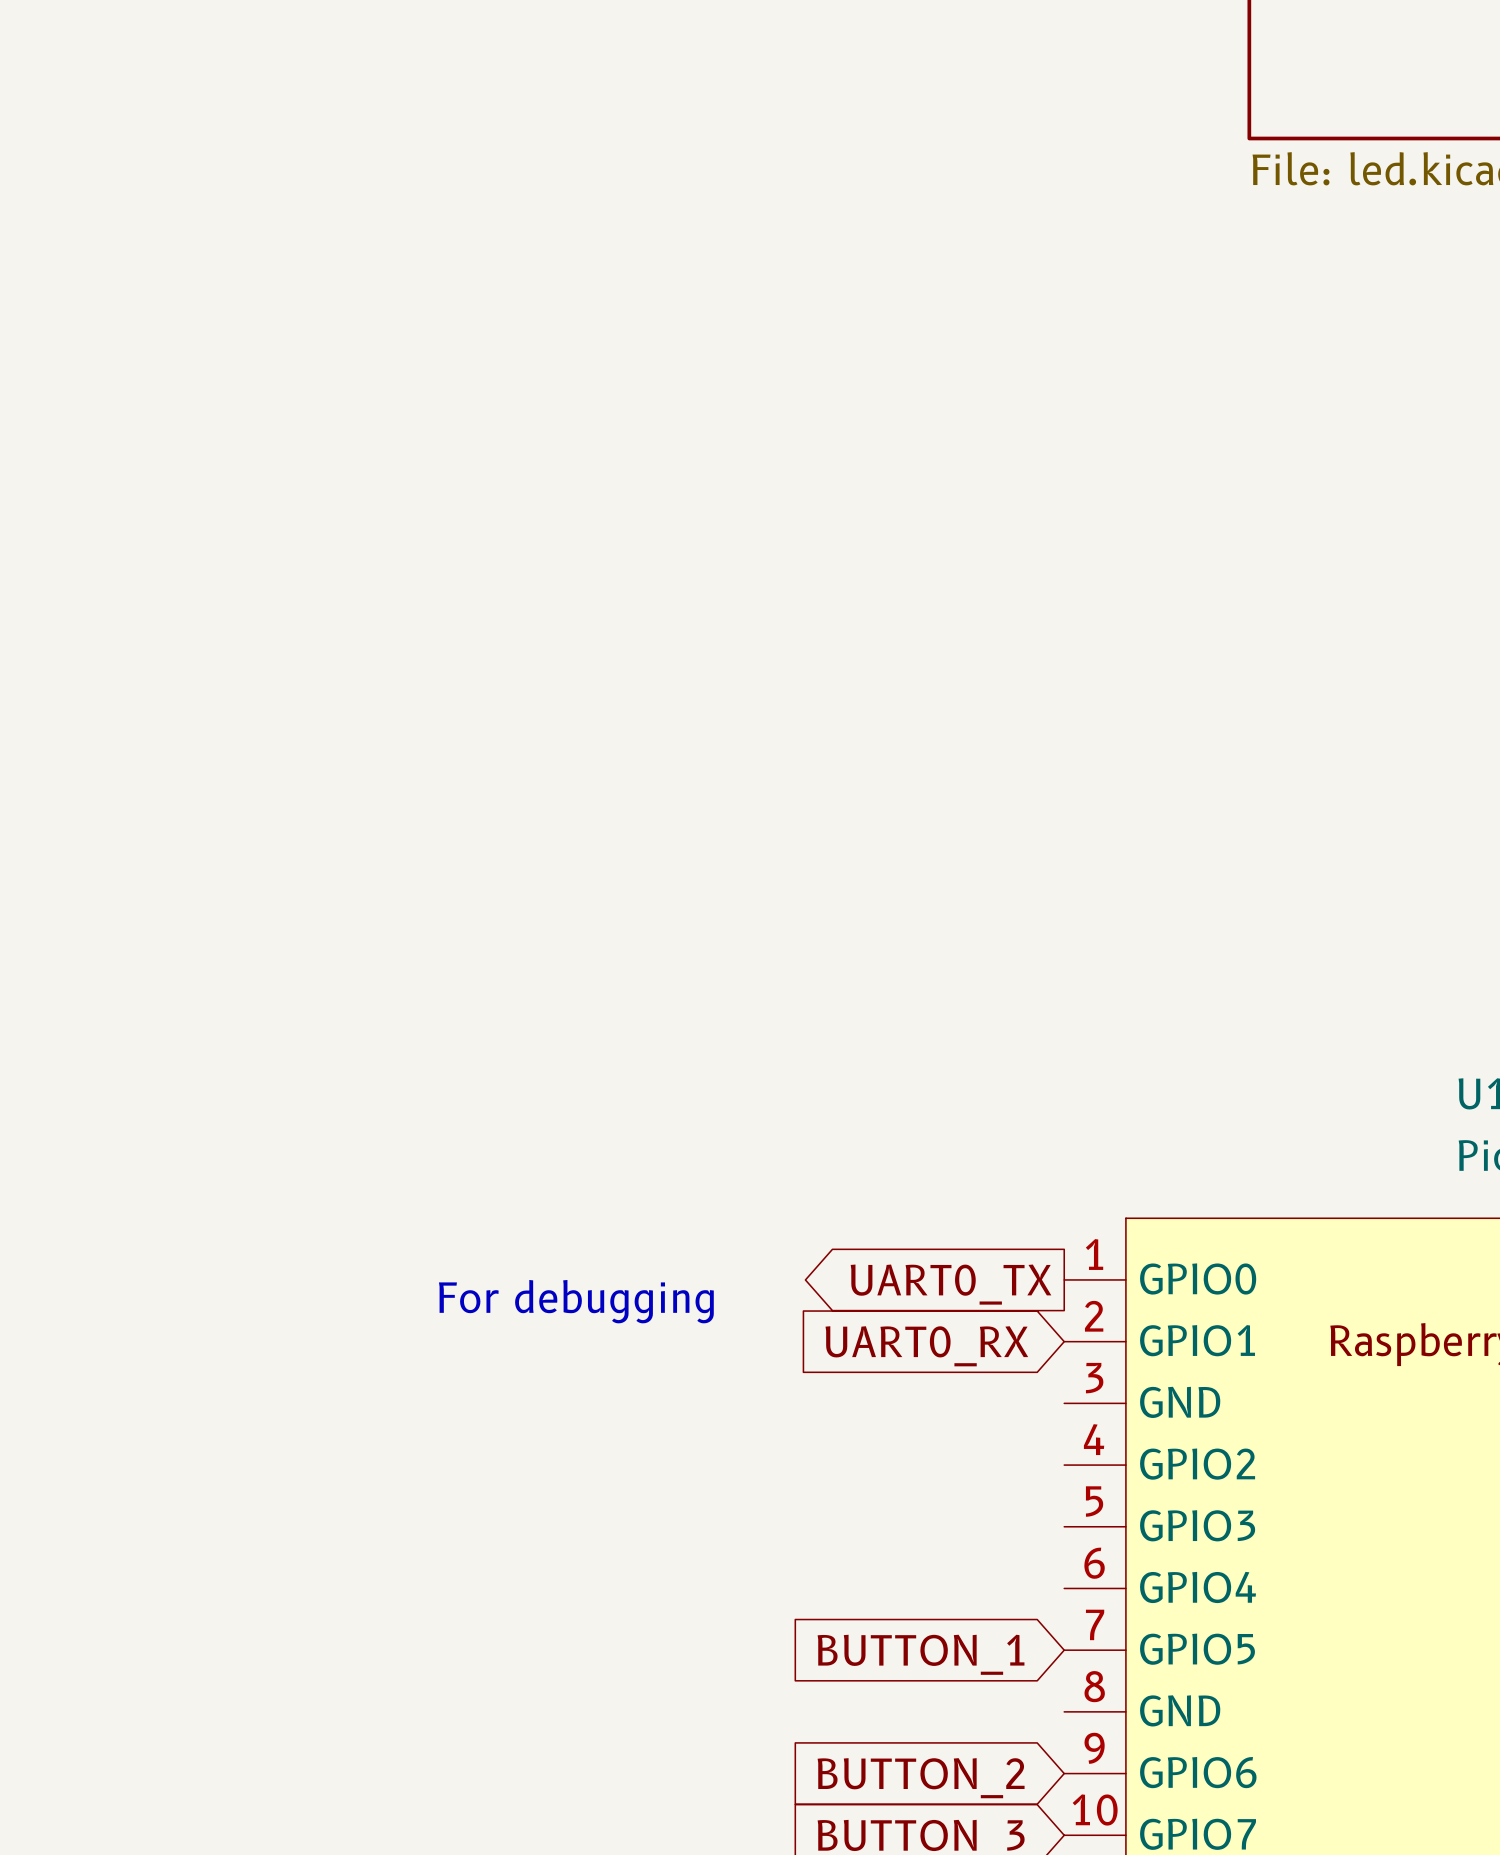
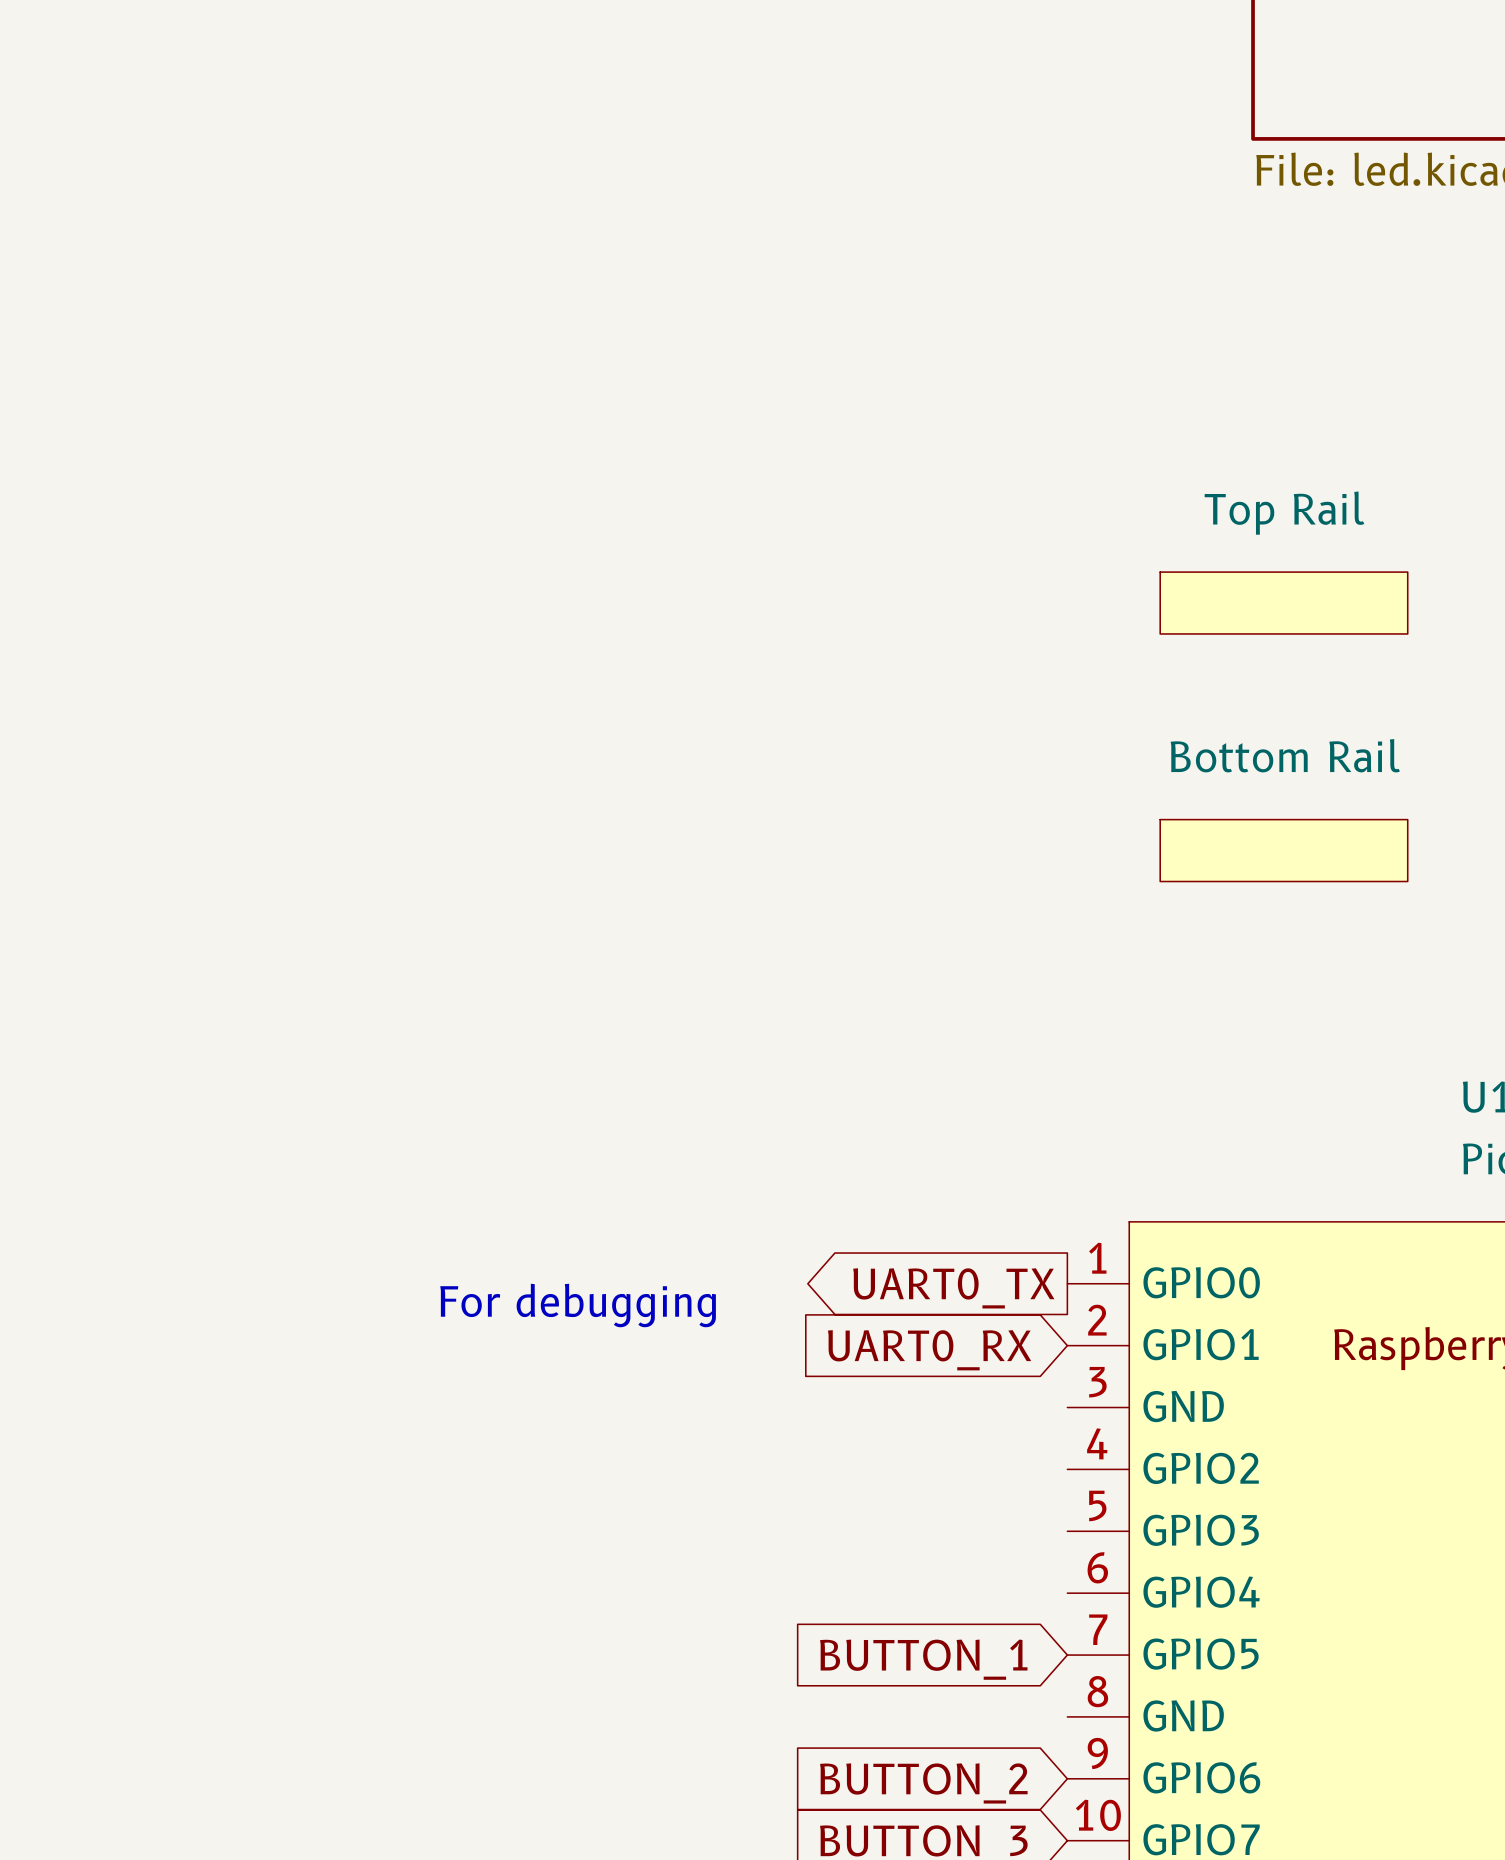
part: none -> Top Rail (1283, 603)
part: none -> Bottom Rail (1283, 850)

